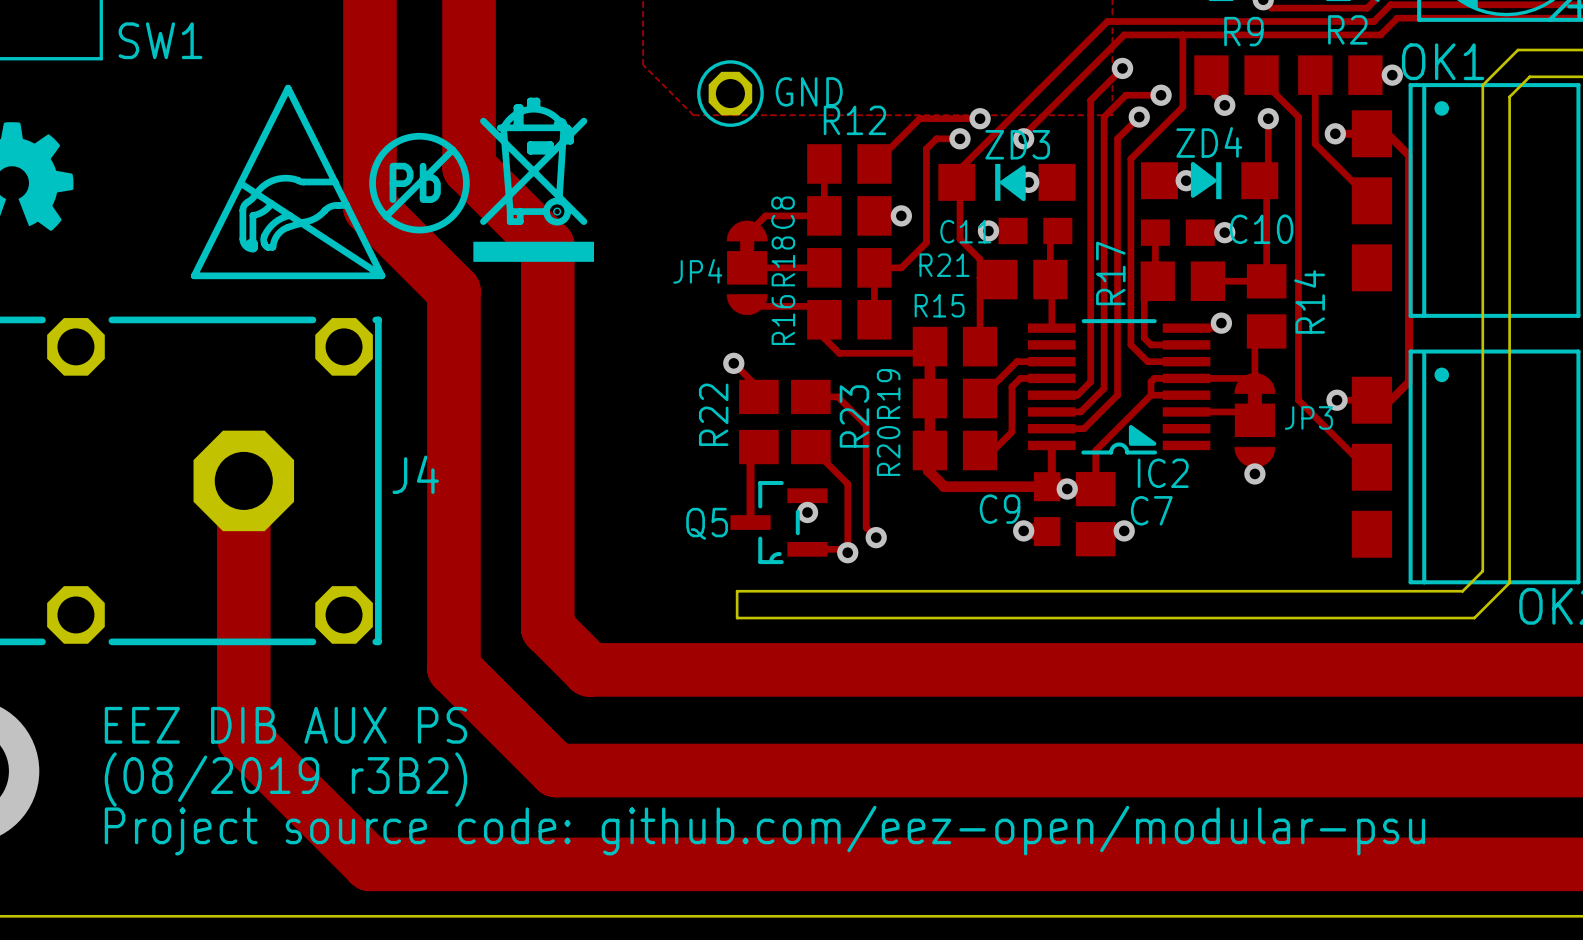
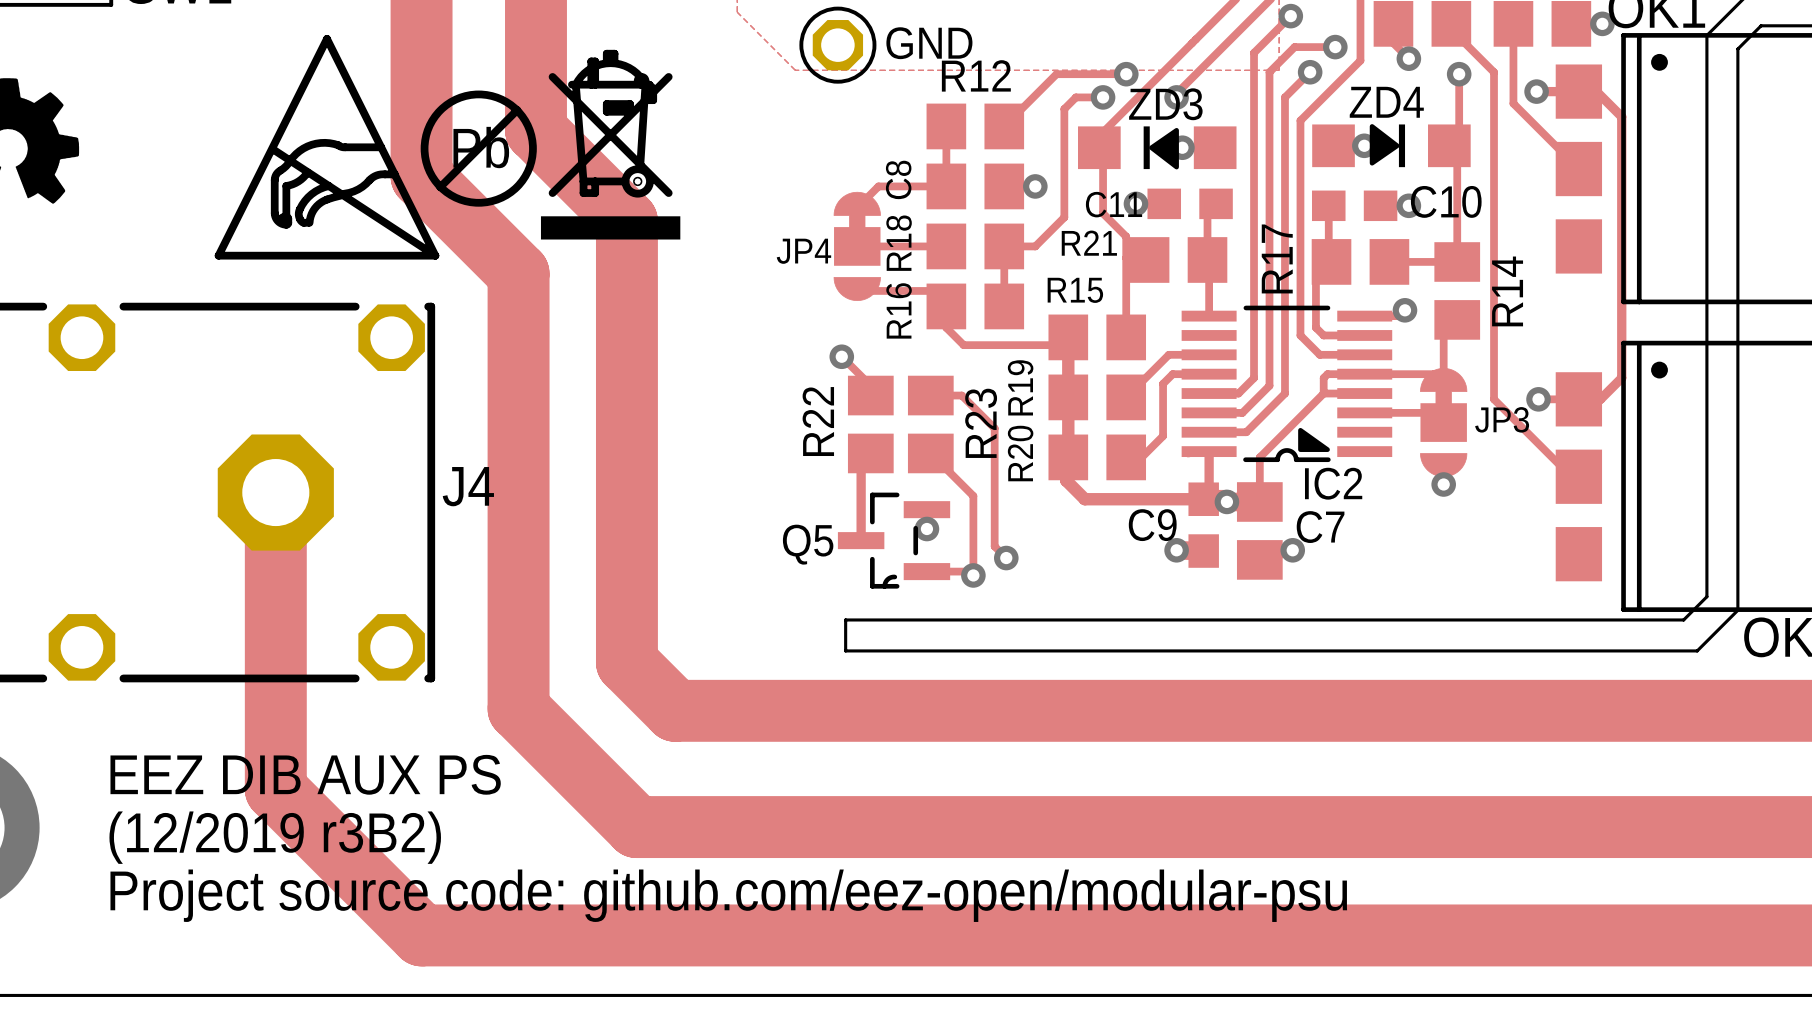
text: (08/2019 r3B2) (285, 779) -> (12/2019 r3B2) (275, 837)

